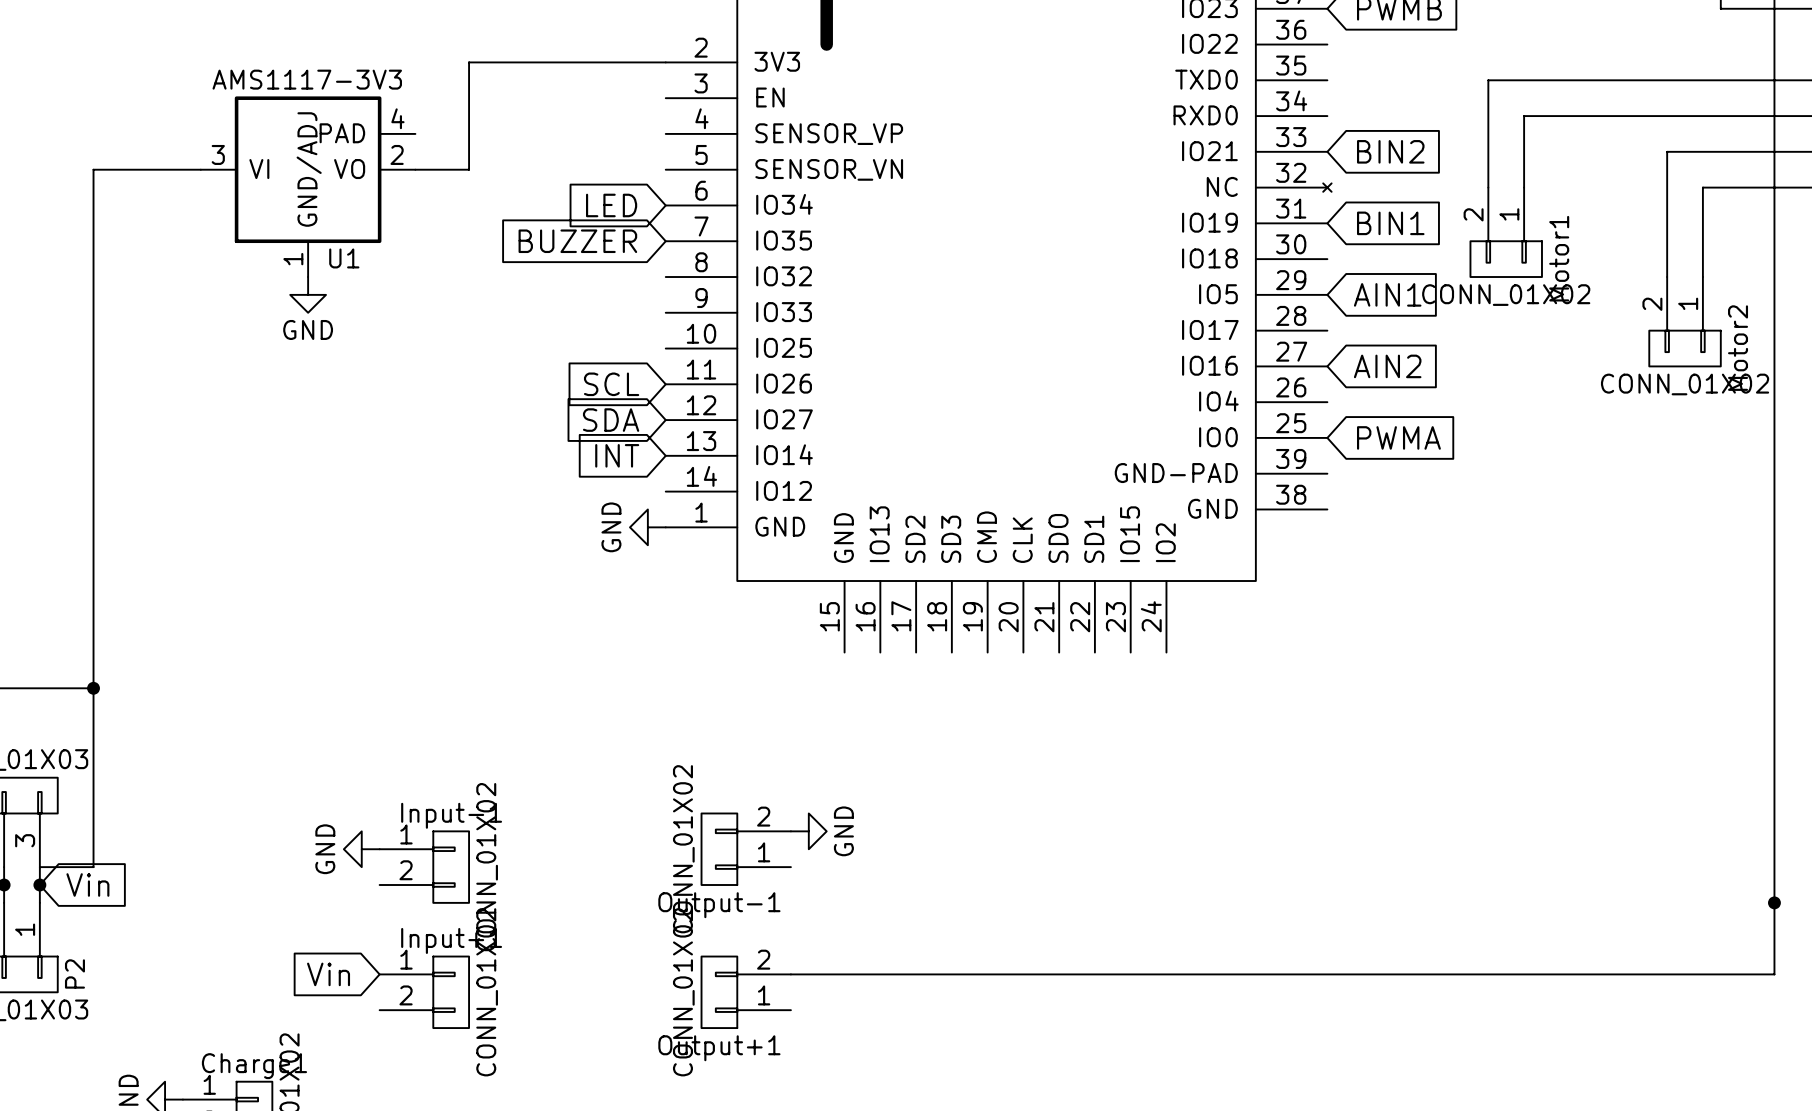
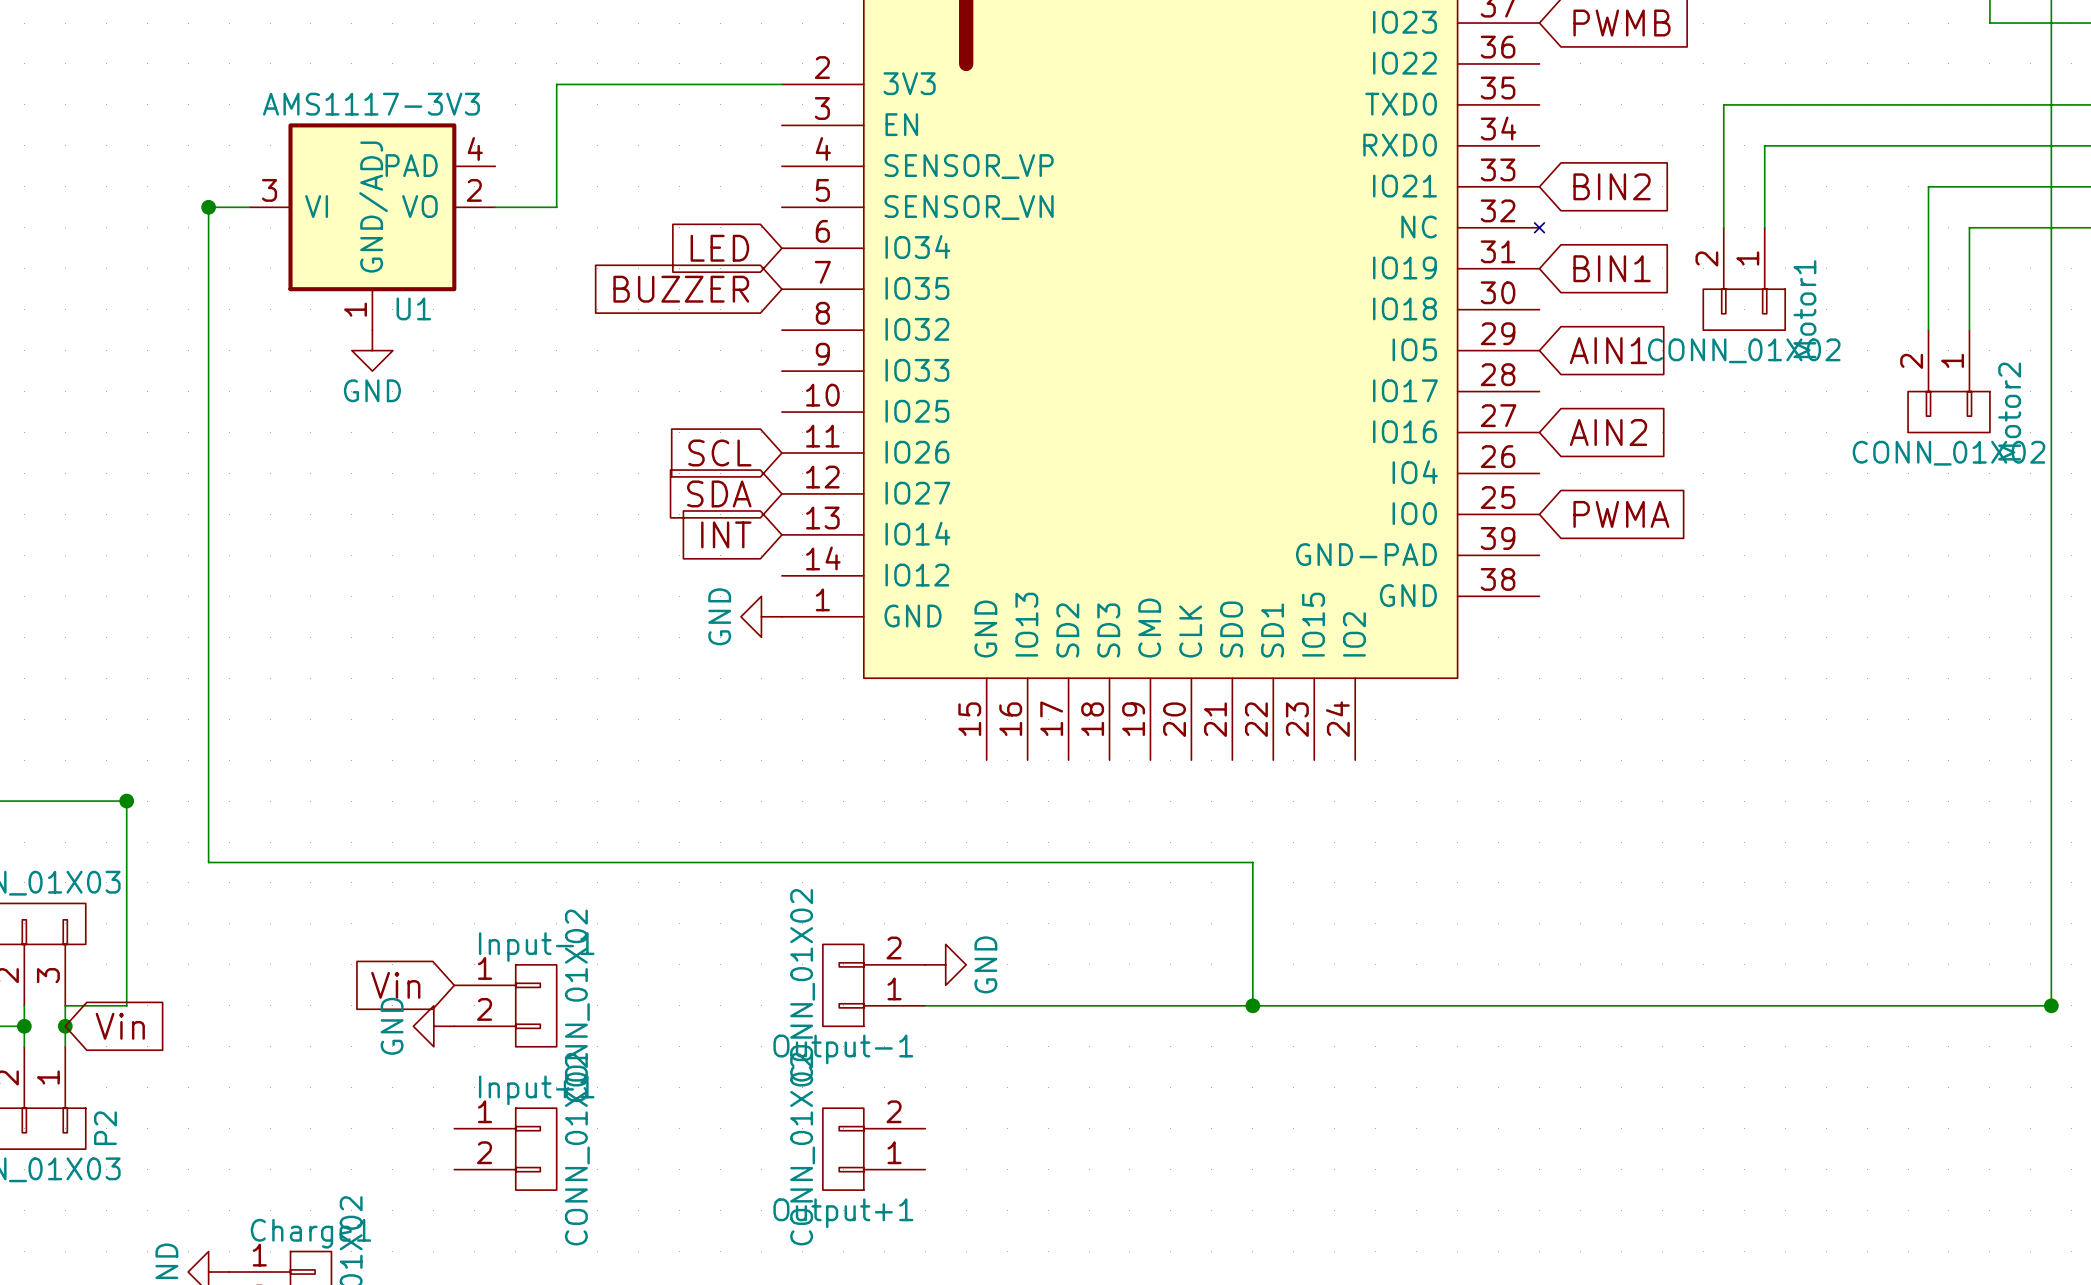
wire: (165, 169) (93, 169) (93, 688) -> (208, 207) (208, 862) (1252, 862) (1252, 1005)
junction: none -> (208, 207)
power symbol position: GND (361, 849) -> GND (433, 1026)
junction: none -> (1252, 1005)
wire: (1774, 867) (1774, 974) (790, 974) -> (2051, 1005) (925, 1005)
junction position: (1774, 902) -> (2051, 1005)
global label position: Vin (328, 974) -> Vin (395, 985)

